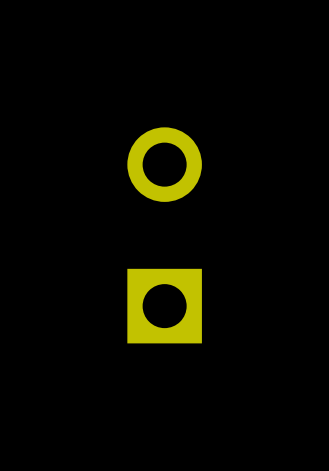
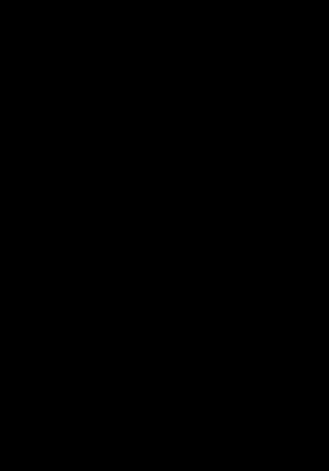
part: (164, 235) -> none

